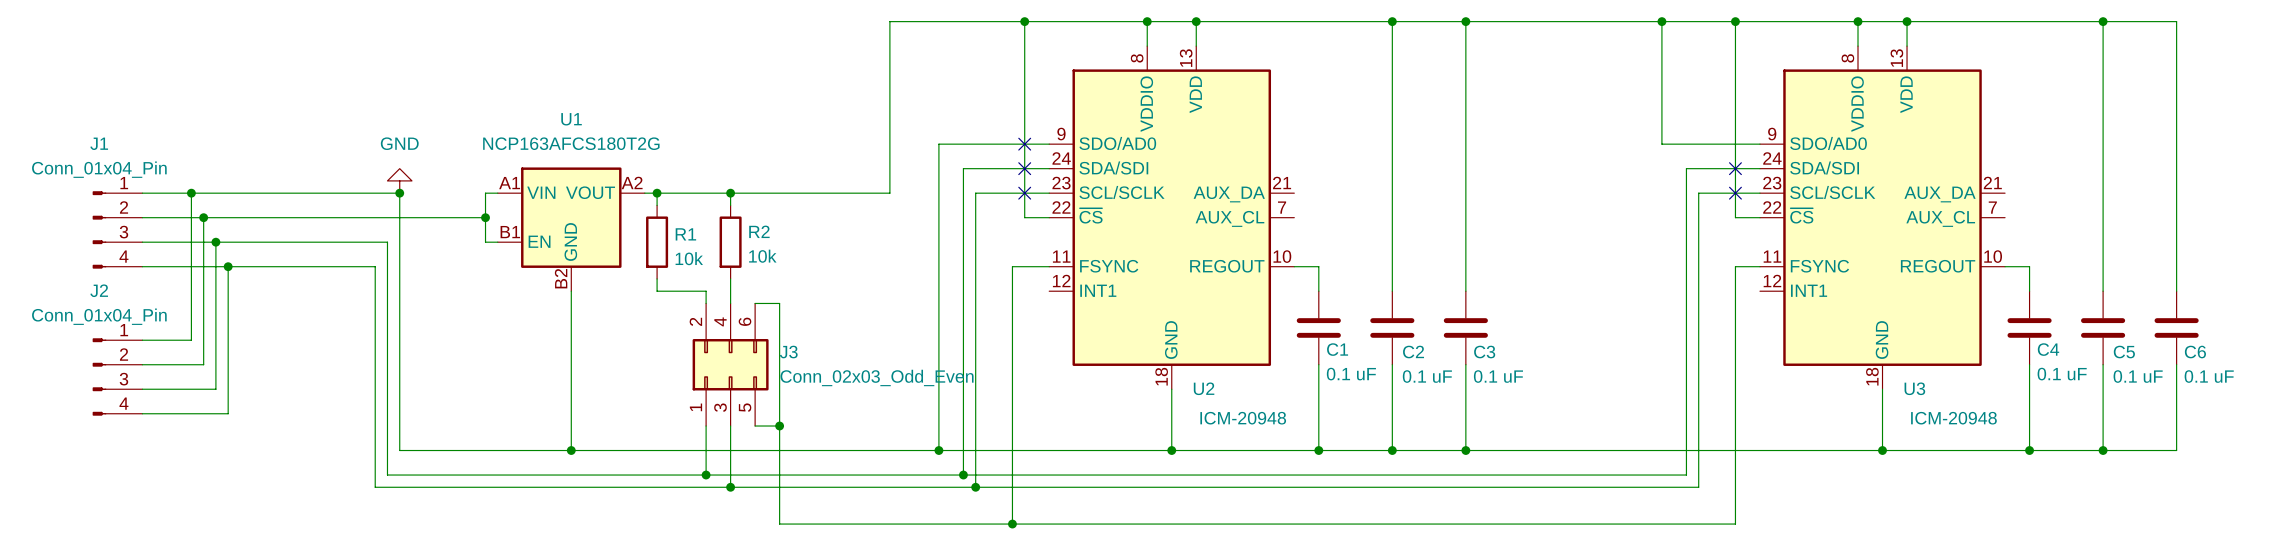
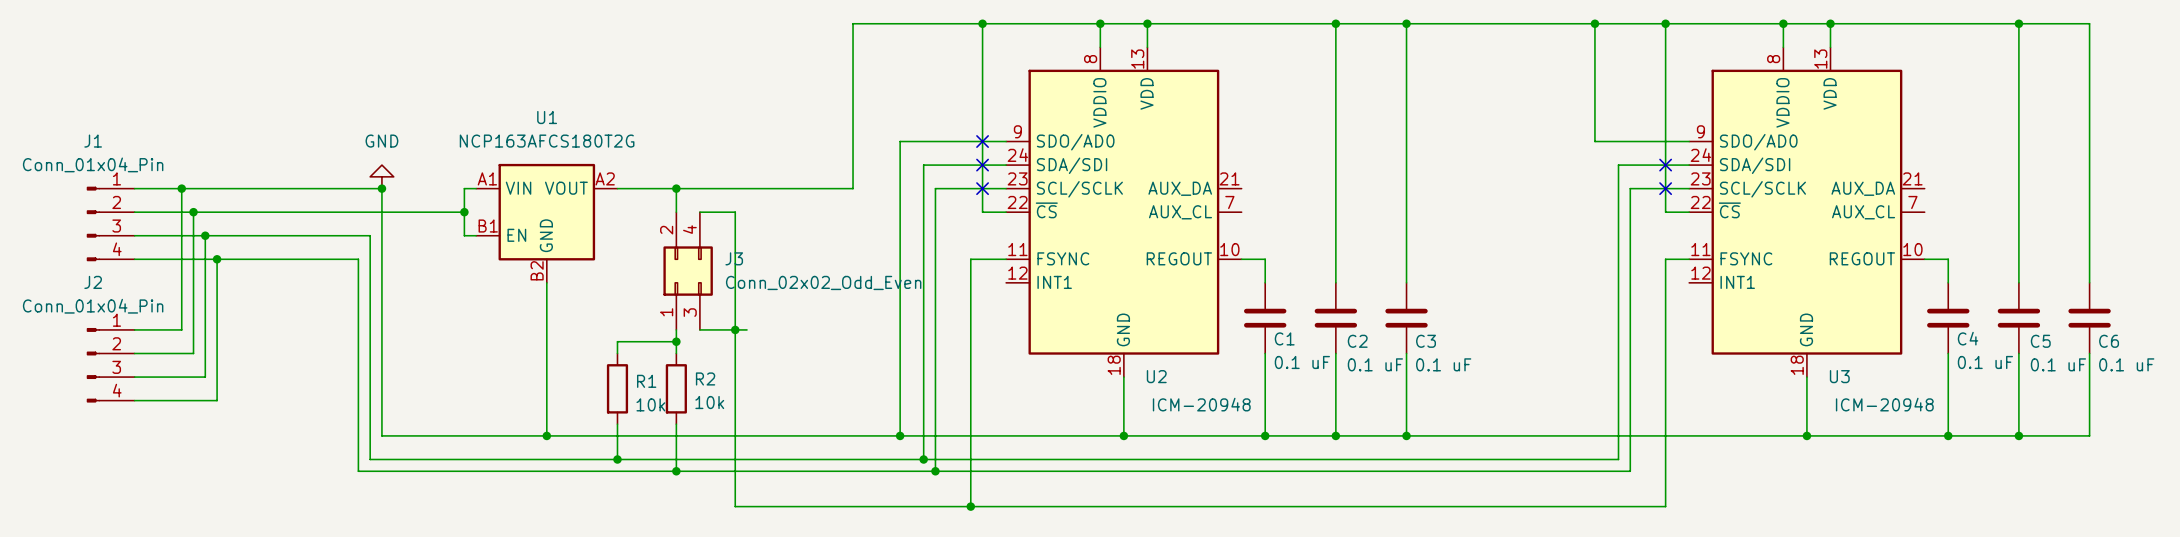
wire: (657, 193) (657, 205) -> none
junction: (657, 193) -> none
wire: none -> (676, 188) (676, 212)
junction: none -> (676, 188)
wire: (730, 193) (730, 205) -> none
junction: (730, 193) -> none
R1 position: (657, 242) -> (617, 388)
R2 position: (730, 242) -> (676, 388)
wire: (657, 278) (657, 291) (706, 291) (706, 303) -> none
J3 symbol: [692, 303, 769, 427] -> [663, 212, 713, 330]
wire: (755, 303) (779, 303) (779, 524) -> (699, 212) (735, 212) (735, 506) (747, 506)
junction: none -> (735, 329)
wire: none -> (676, 341) (617, 341) (617, 353)
junction: none -> (676, 341)
J3 value: Conn_02x03_Odd_Even (877, 377) -> Conn_02x02_Odd_Even (823, 282)
wire: (730, 426) (730, 487) -> none
wire: (755, 426) (779, 426) -> none
junction: (779, 426) -> none
wire: none -> (617, 424) (617, 459)
junction: none -> (617, 459)
junction: (706, 475) -> none
junction: none -> (676, 471)
junction: (730, 487) -> none

